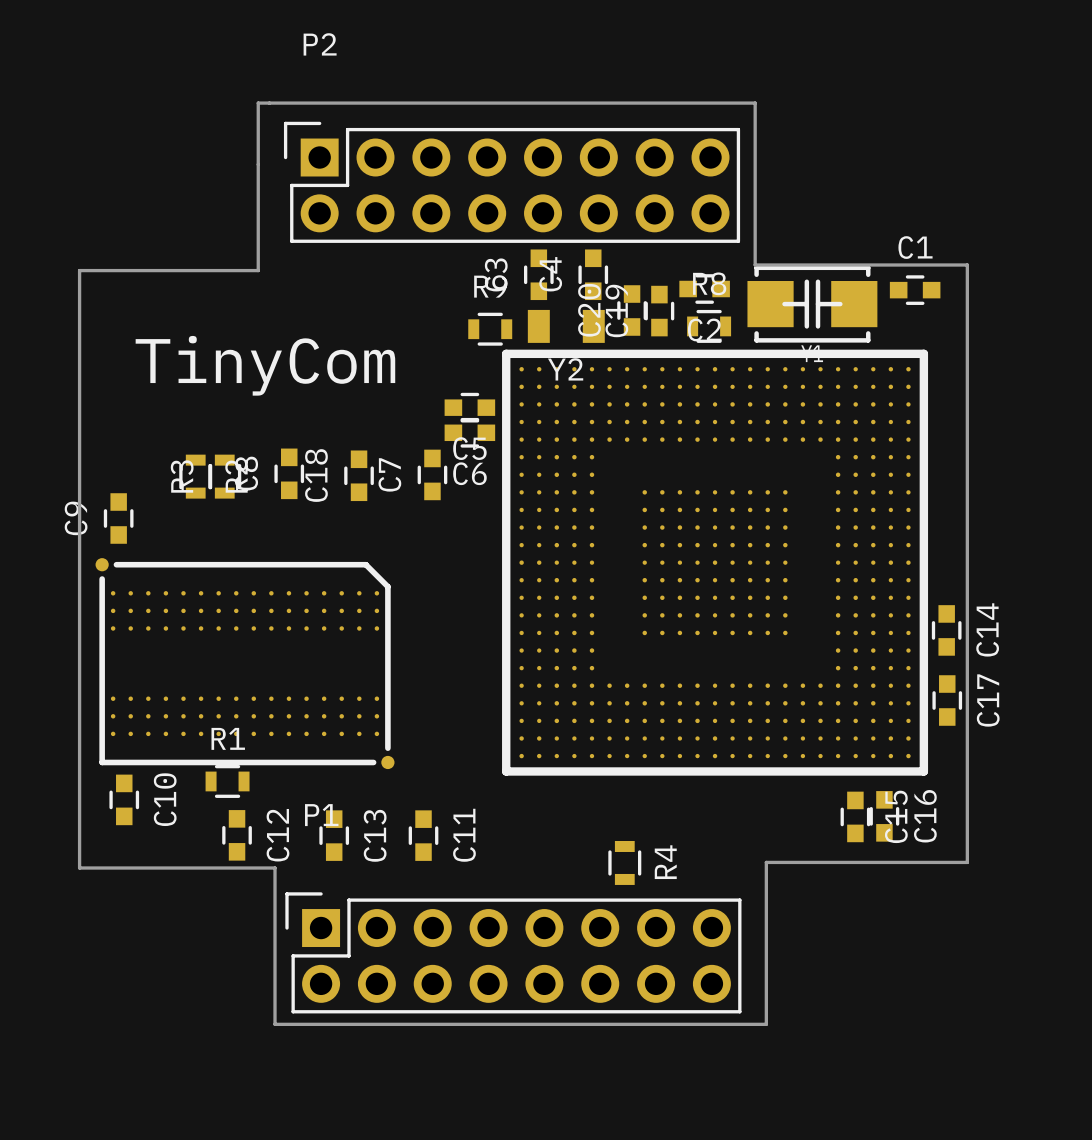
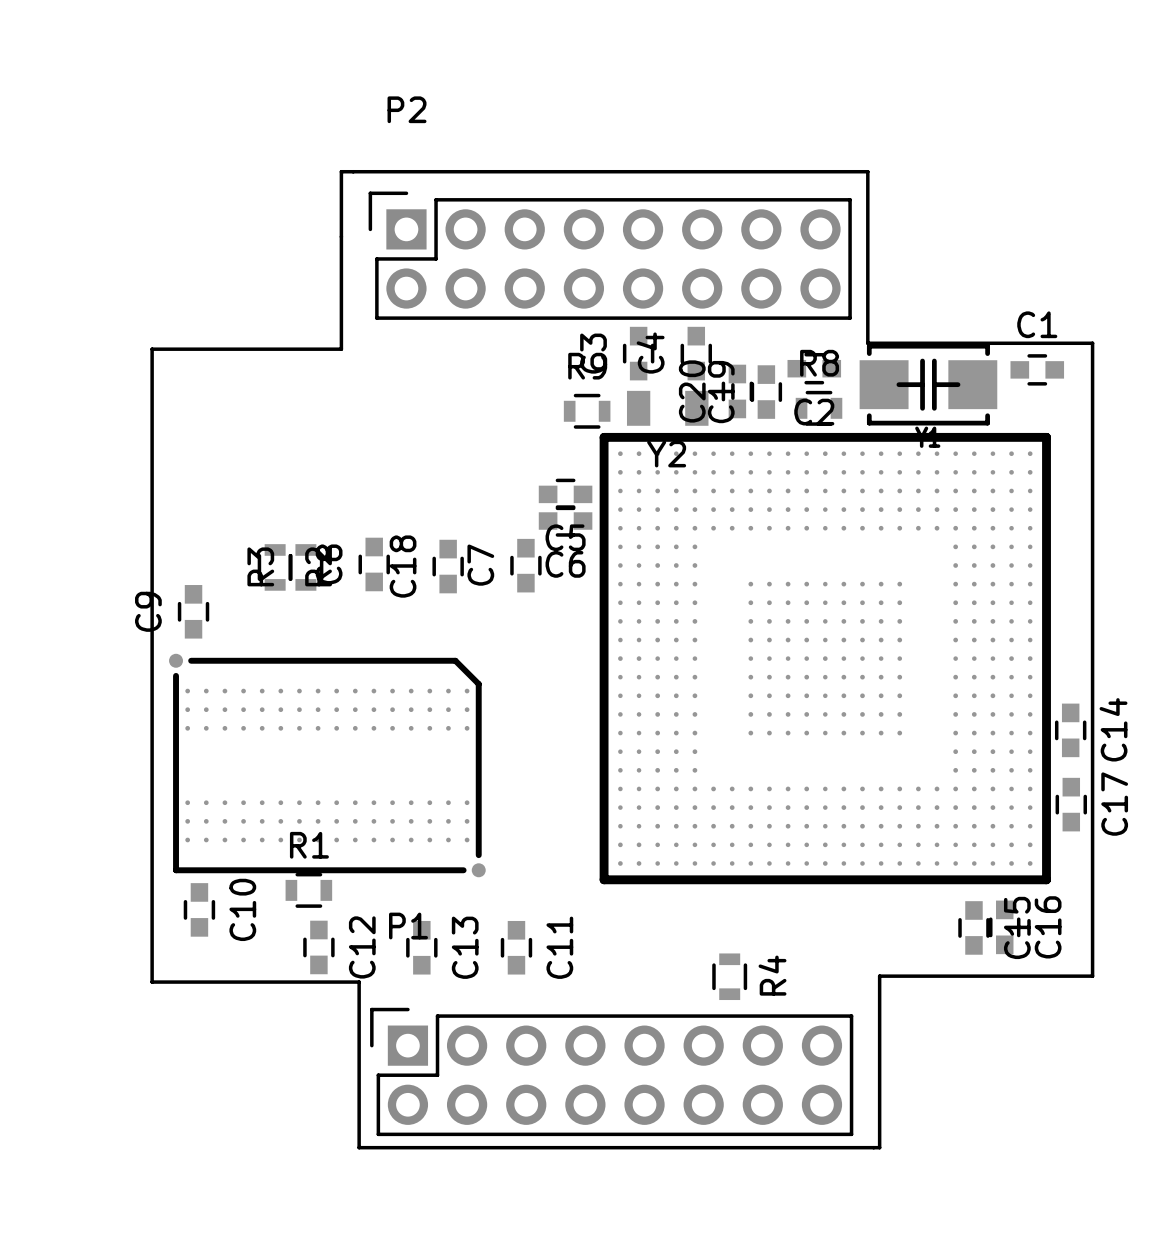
text: TinyCom (265, 365) -> none

